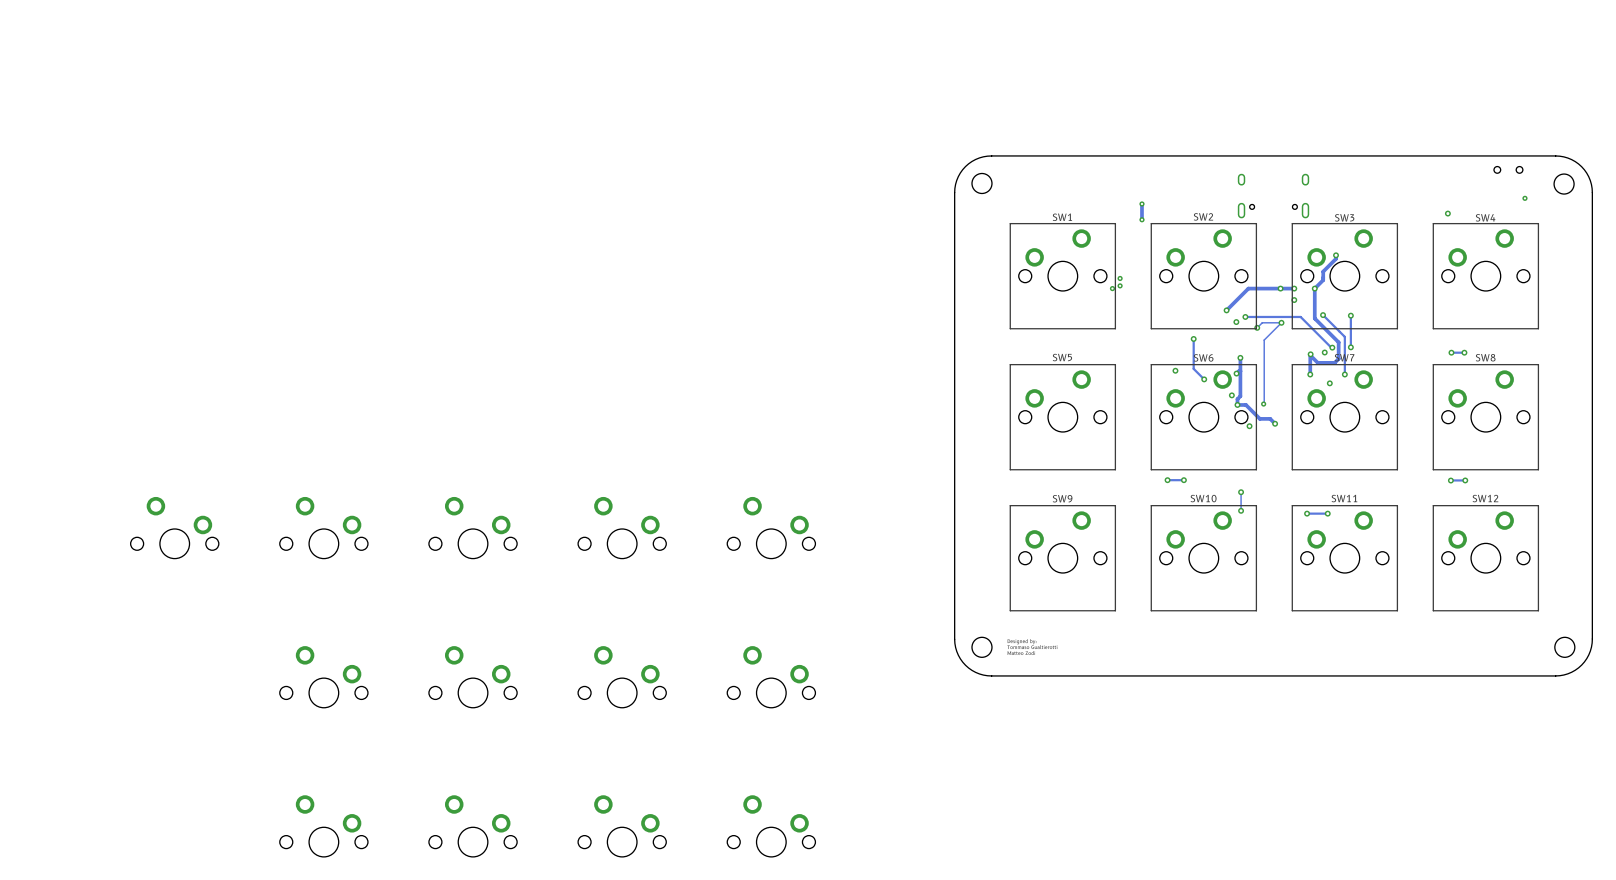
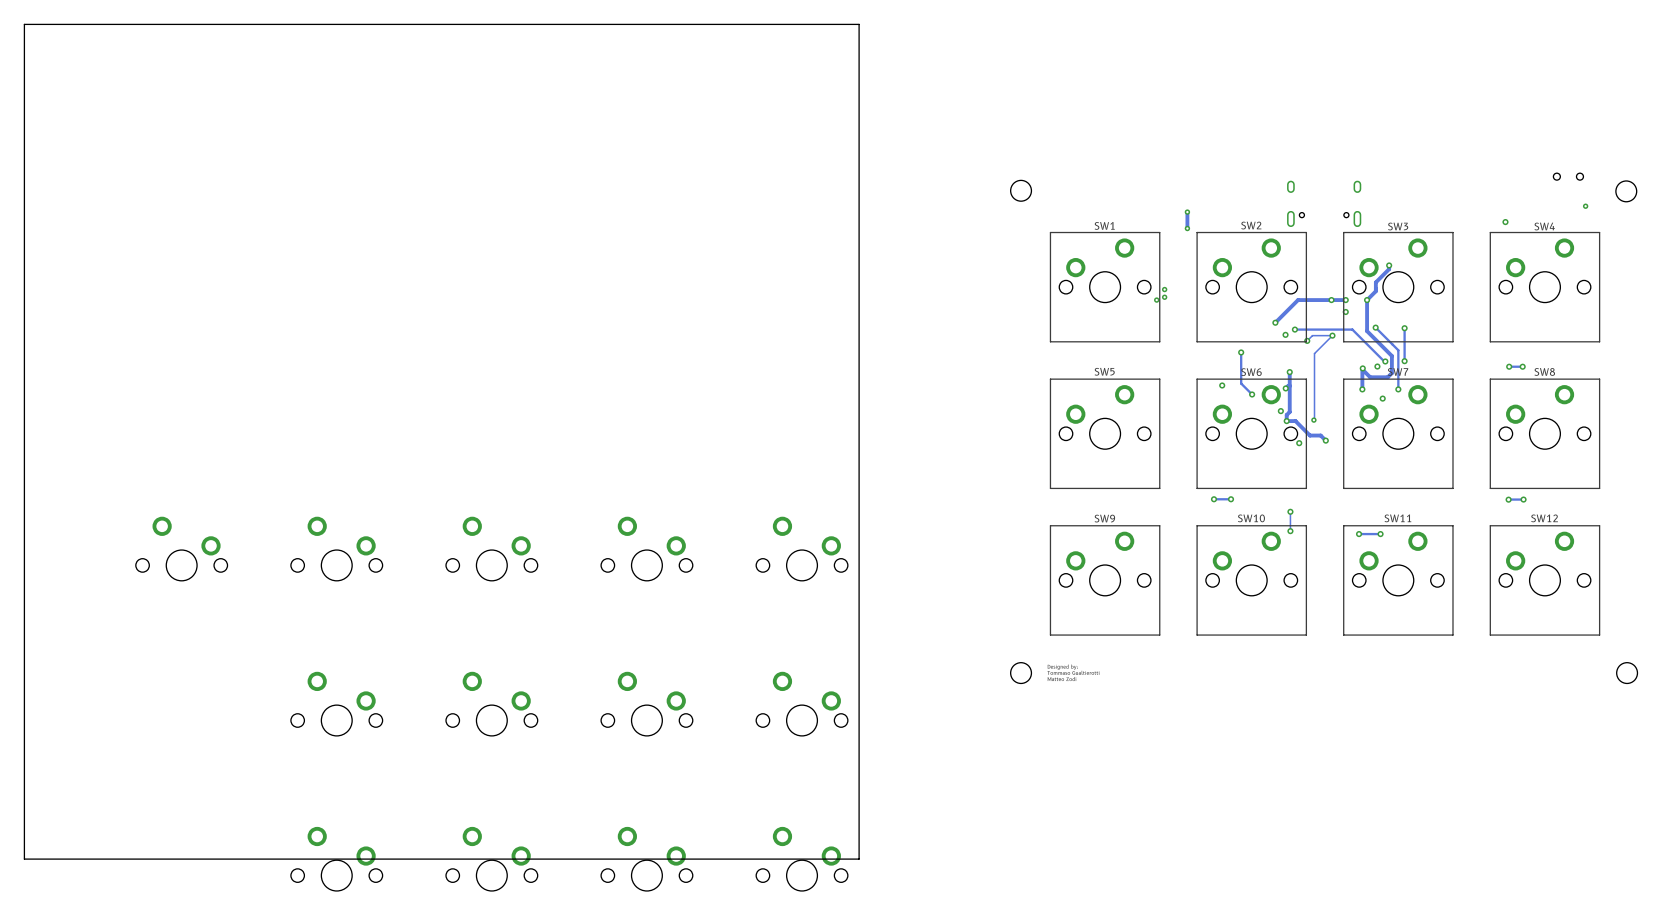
board edge: none -> (859, 24) (24, 24) (24, 859) (859, 859) (859, 24)
board edge: (1555, 155) (991, 155) (979, 157) (968, 163) (958, 176) (954, 192) (954, 639) (956, 651) (962, 662) (975, 672) (991, 675) (1555, 675) (1567, 673) (1578, 667) (1588, 654) (1592, 638) (1592, 192) (1588, 176) (1581, 166) (1571, 159) (1555, 155) -> none

